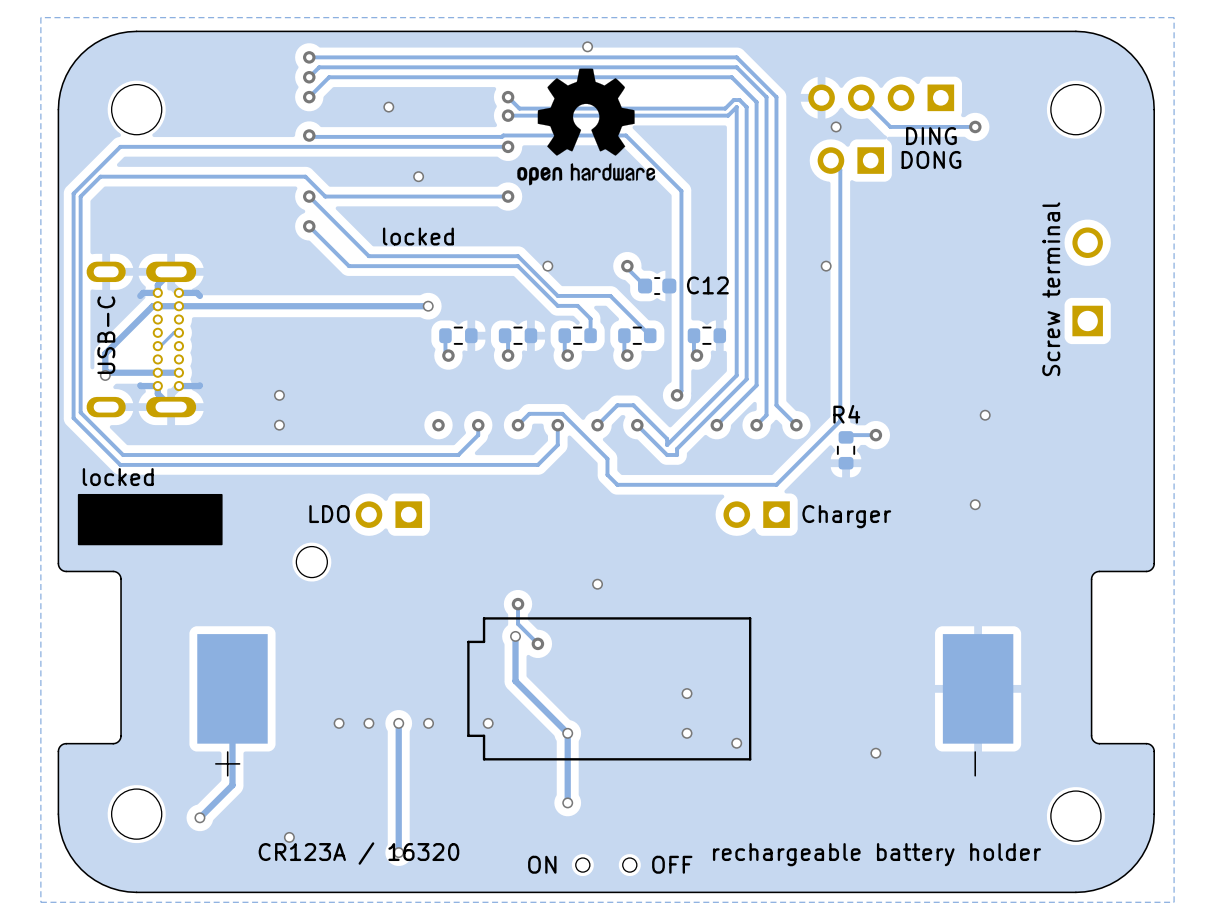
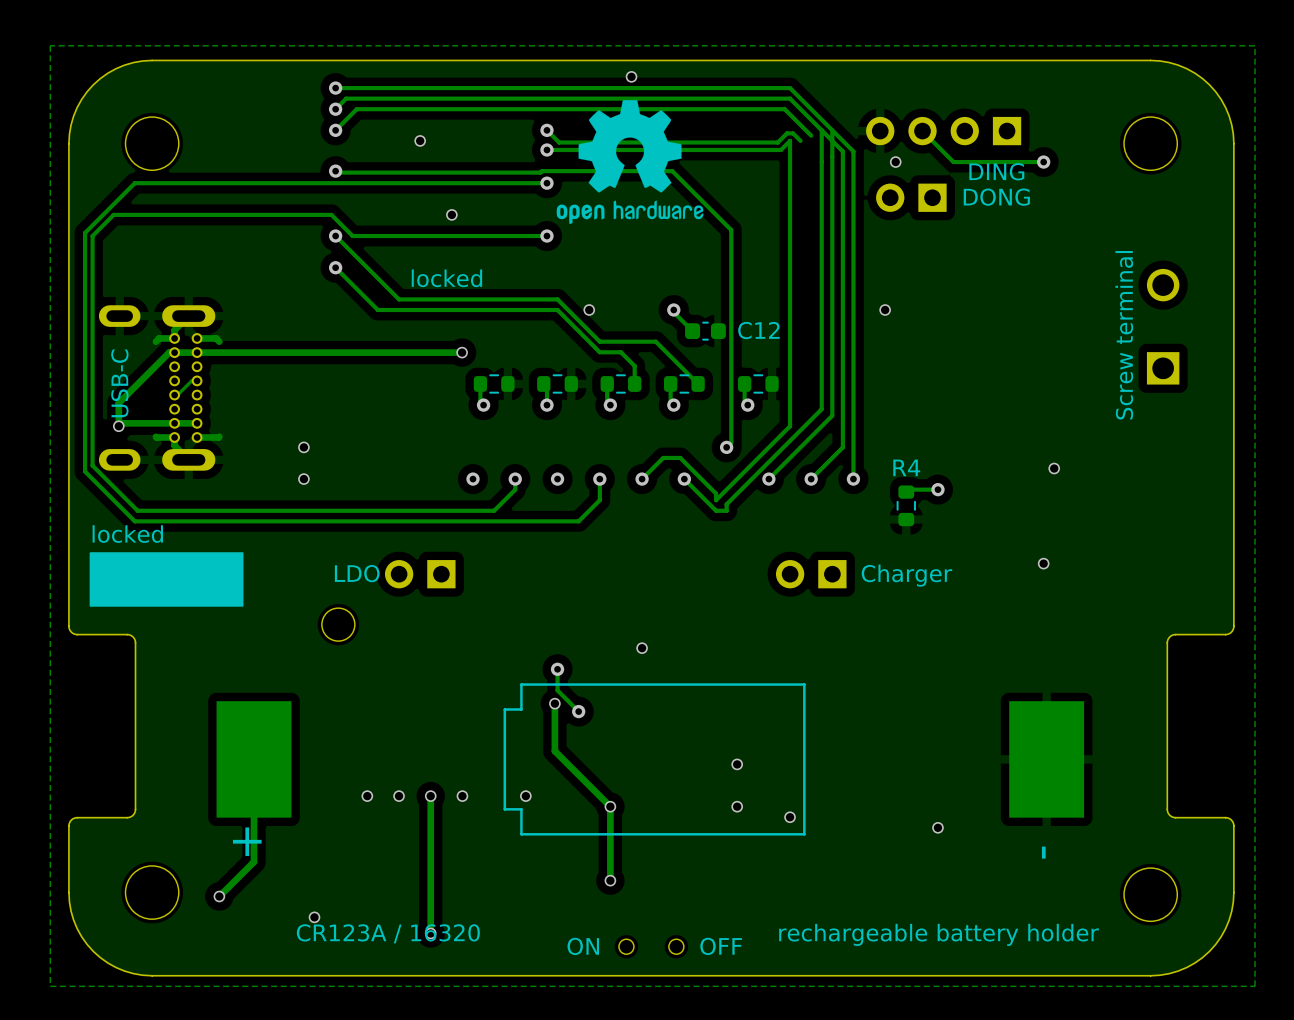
track: none -> (821, 130) (842, 151) (842, 447) (821, 468)
track: none -> (832, 130) (853, 151) (853, 479)
track: (756, 102) (756, 385) -> none
track: (746, 107) (746, 379) -> none
track: (830, 160) (840, 169) (840, 420) (776, 484) (617, 484) (607, 474) (607, 458) (562, 413) (529, 413) (518, 425) -> none
track: (766, 359) (766, 415) -> (821, 409) (800, 430)
track: (776, 365) (776, 405) (796, 425) -> (832, 415) (811, 436)

